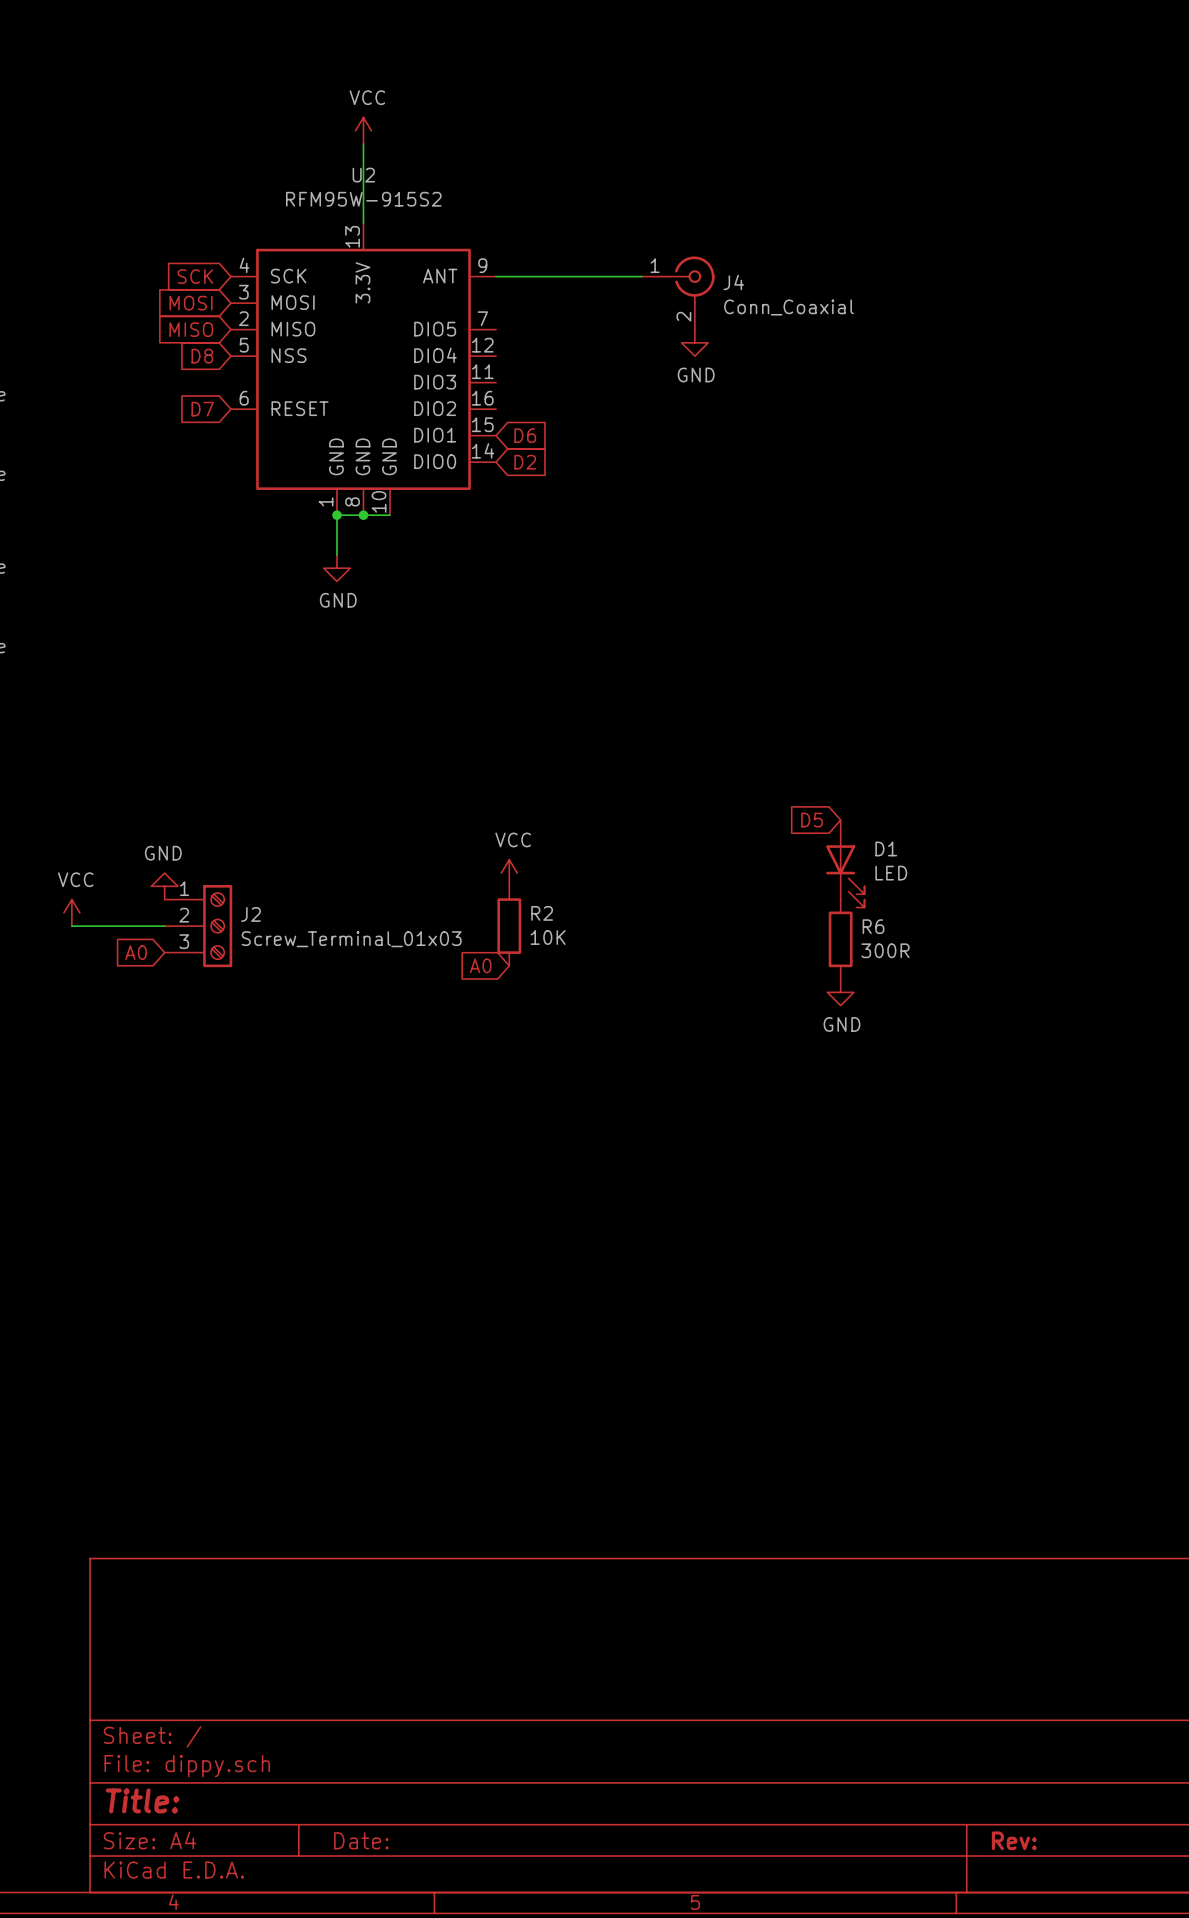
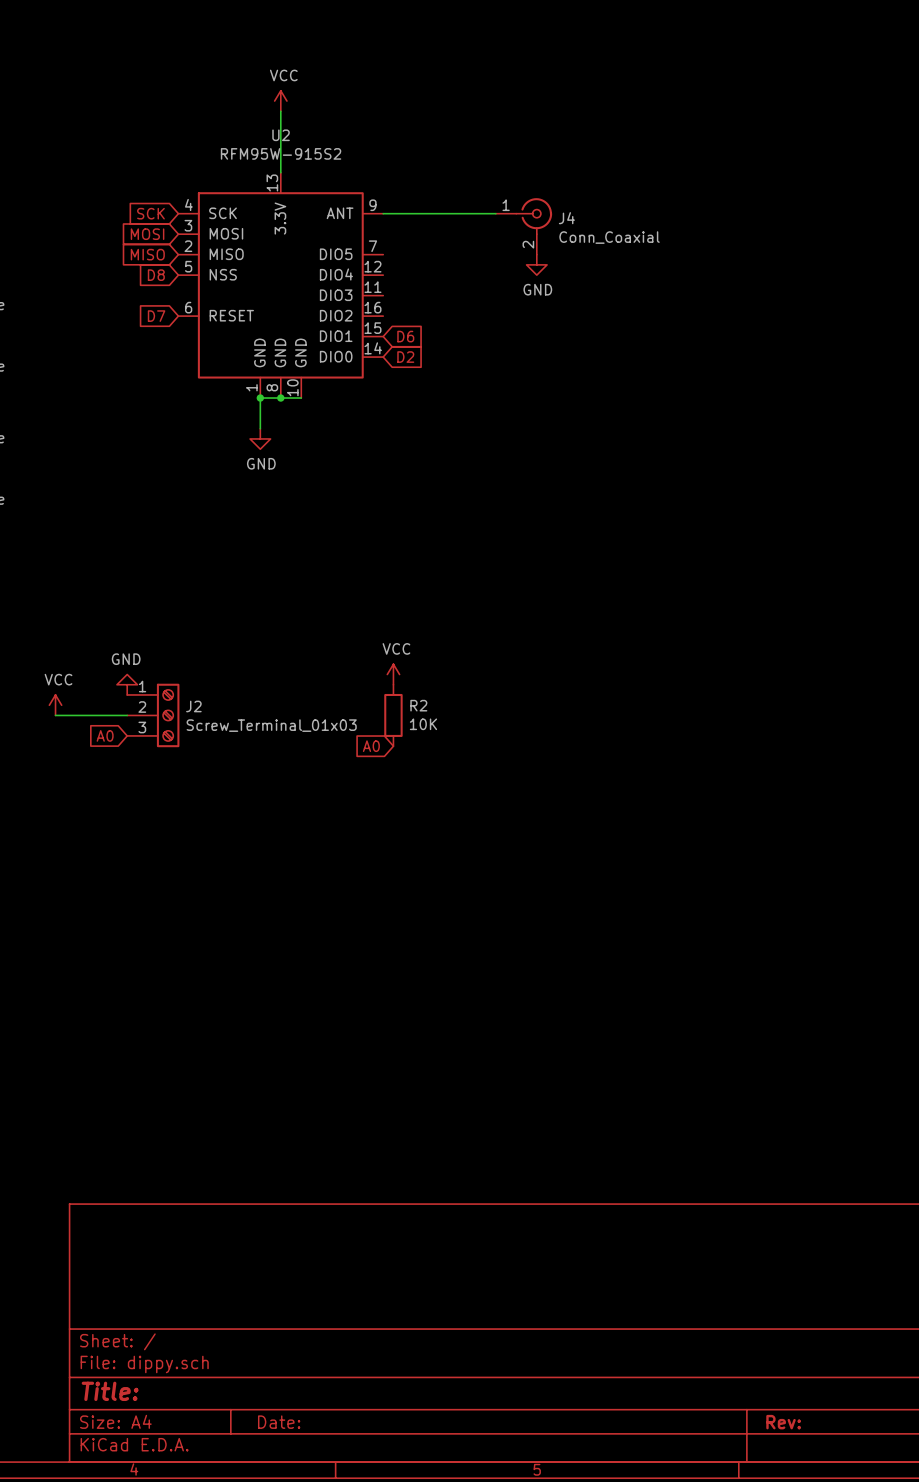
global label: D5 (812, 820) -> none
D1: LED (845, 863) -> none
R6: 300R (840, 939) -> none
power symbol: GND (840, 992) -> none

